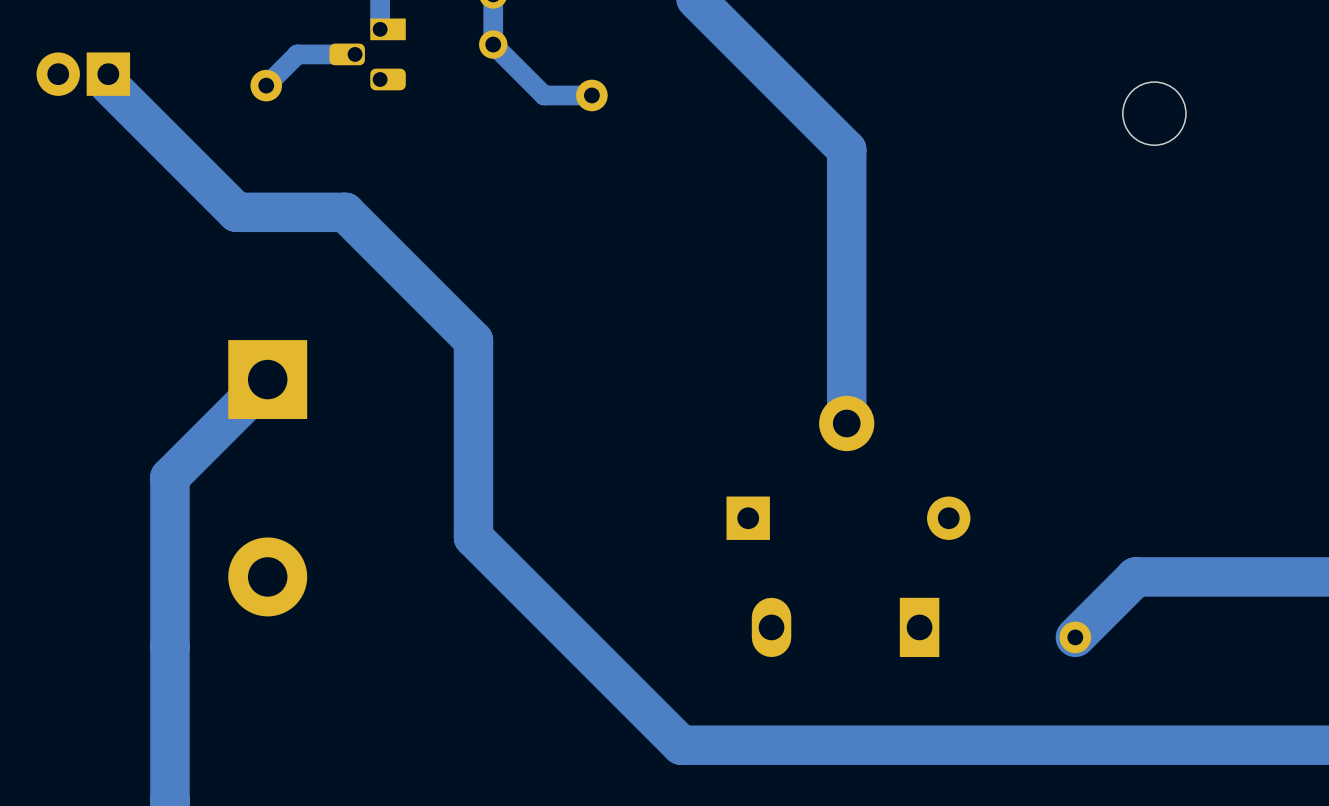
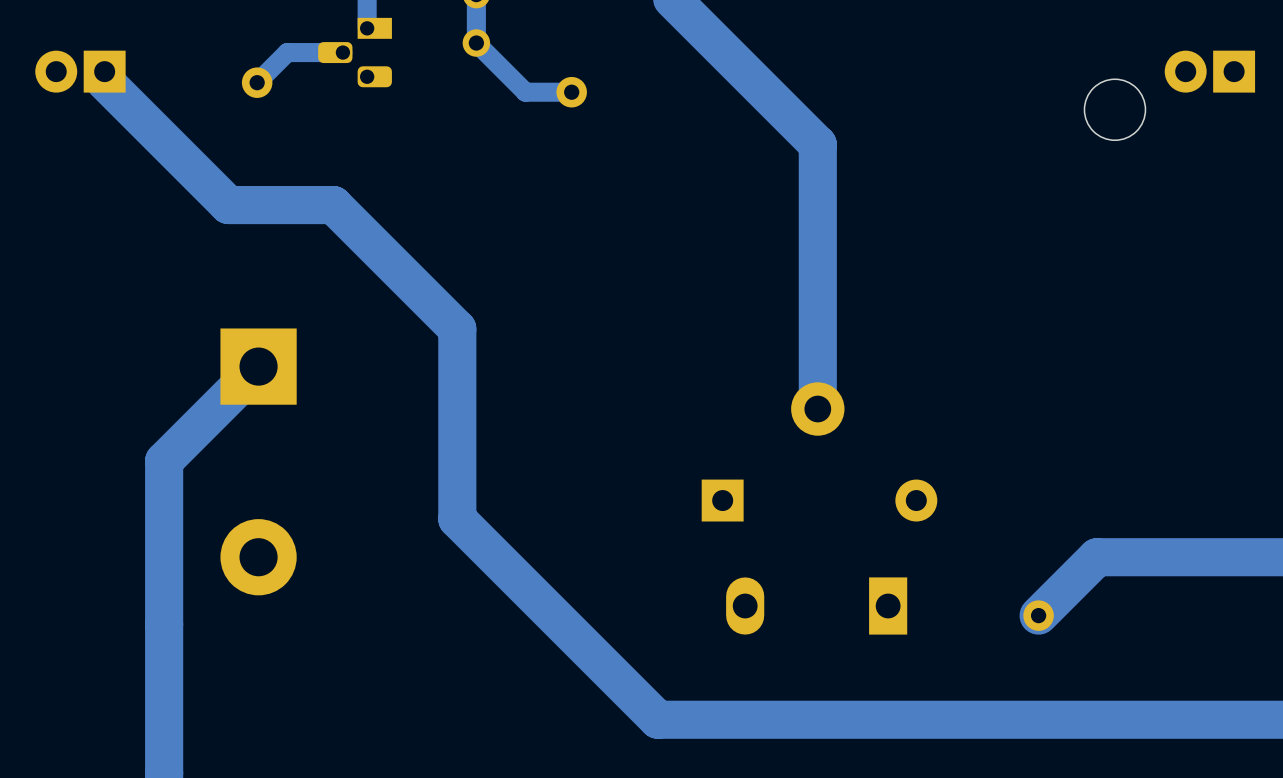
part: none -> (1209, 71)

